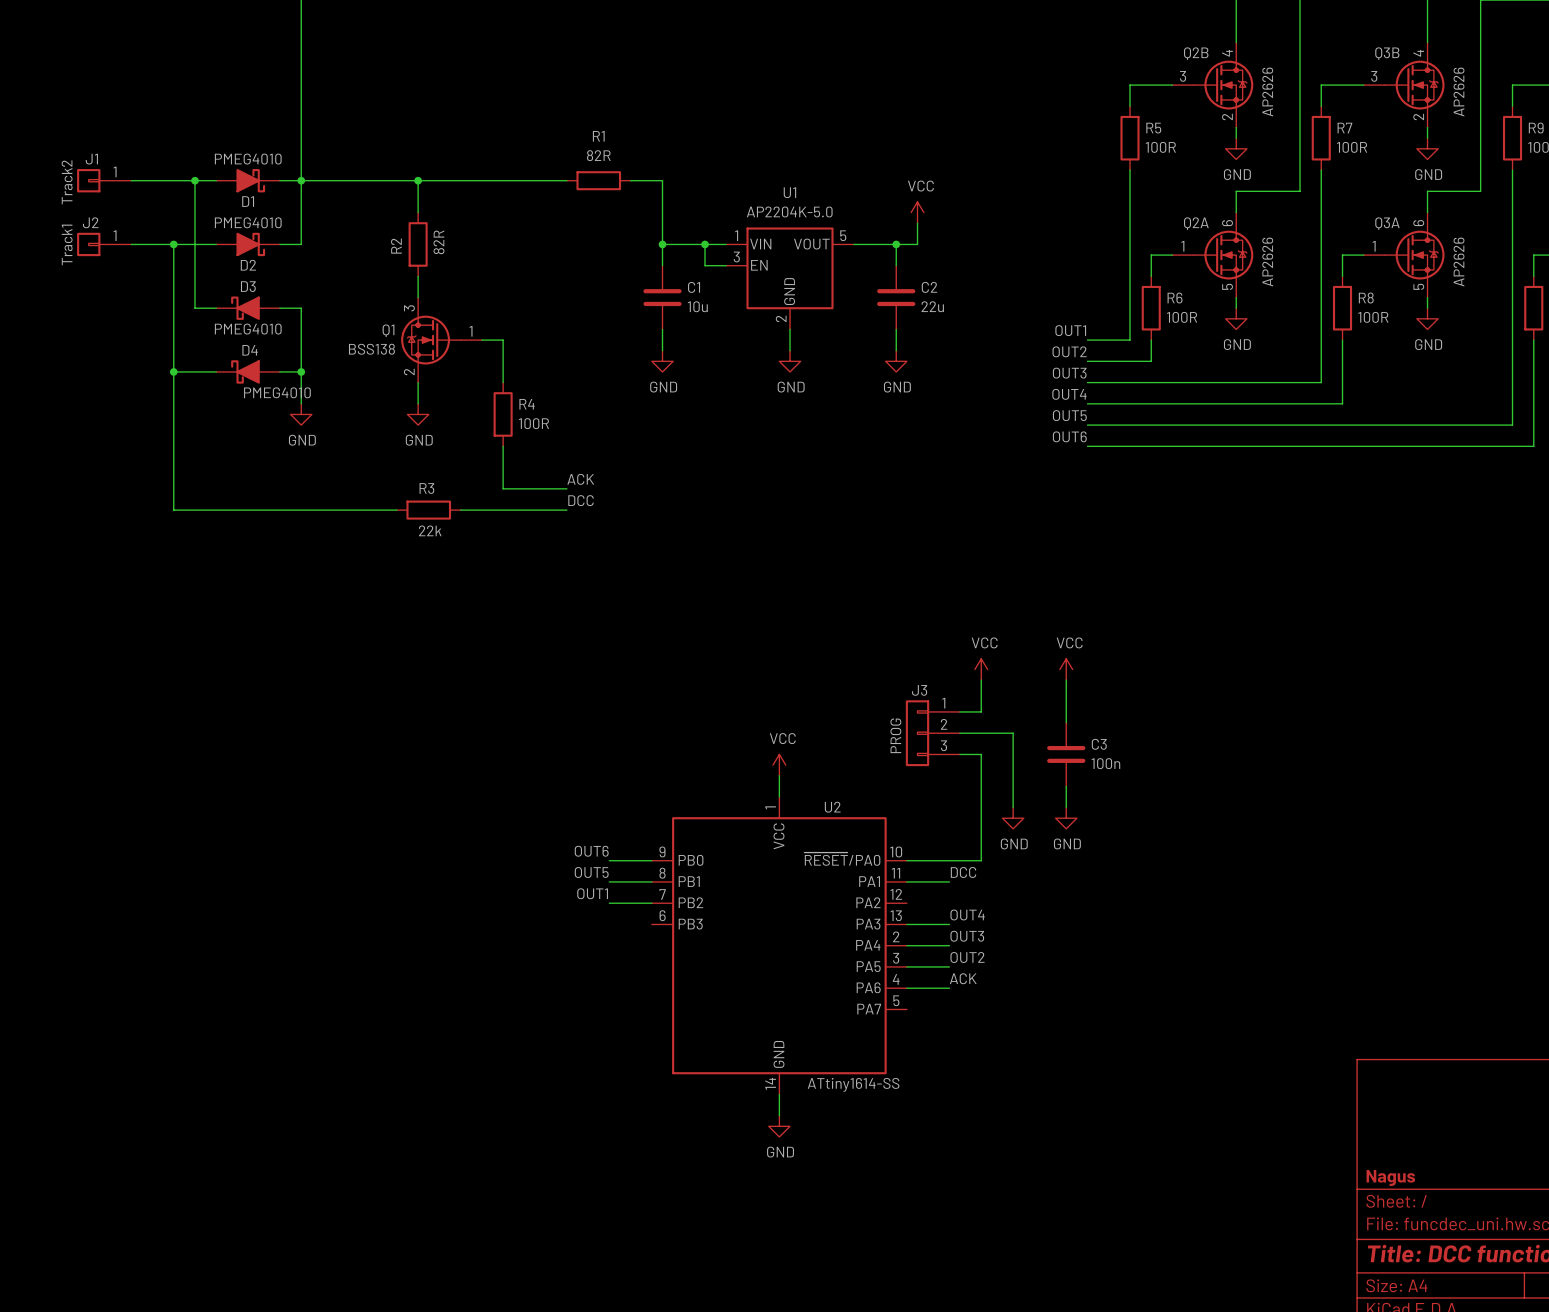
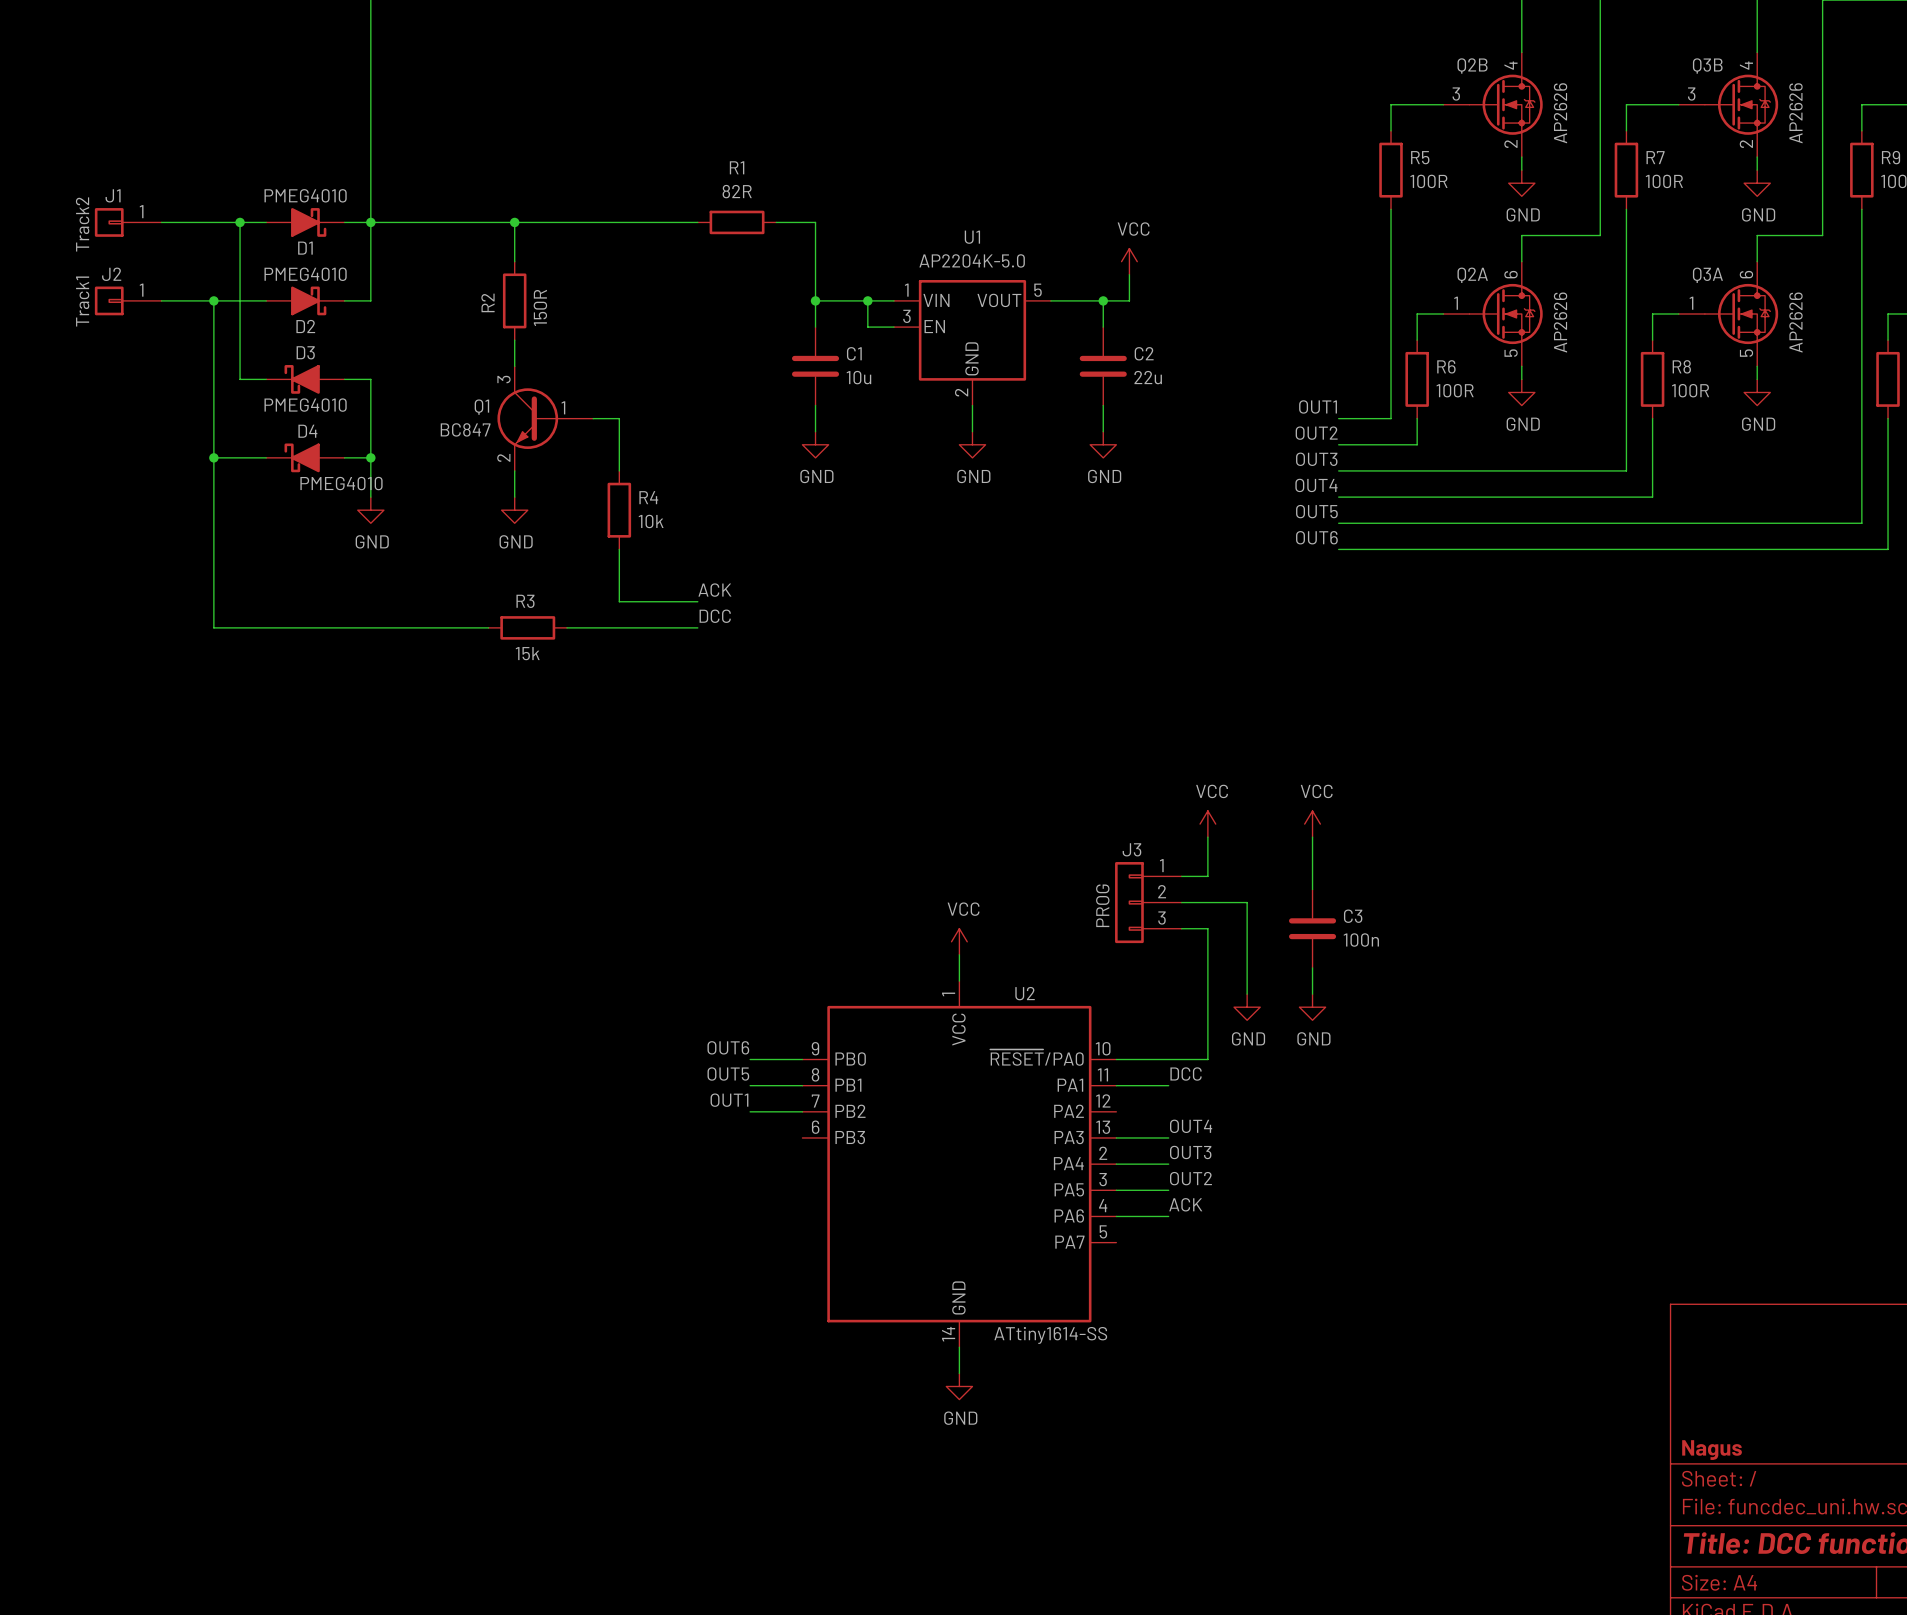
R2 value: 82R (438, 242) -> 150R (540, 307)
Q1 symbol: [401, 297, 482, 383] -> [497, 366, 594, 471]
Q1 value: BSS138 (371, 349) -> BC847 (465, 429)
R4 value: 100R (533, 423) -> 10k (651, 521)
R3 value: 22k (430, 530) -> 15k (527, 653)

